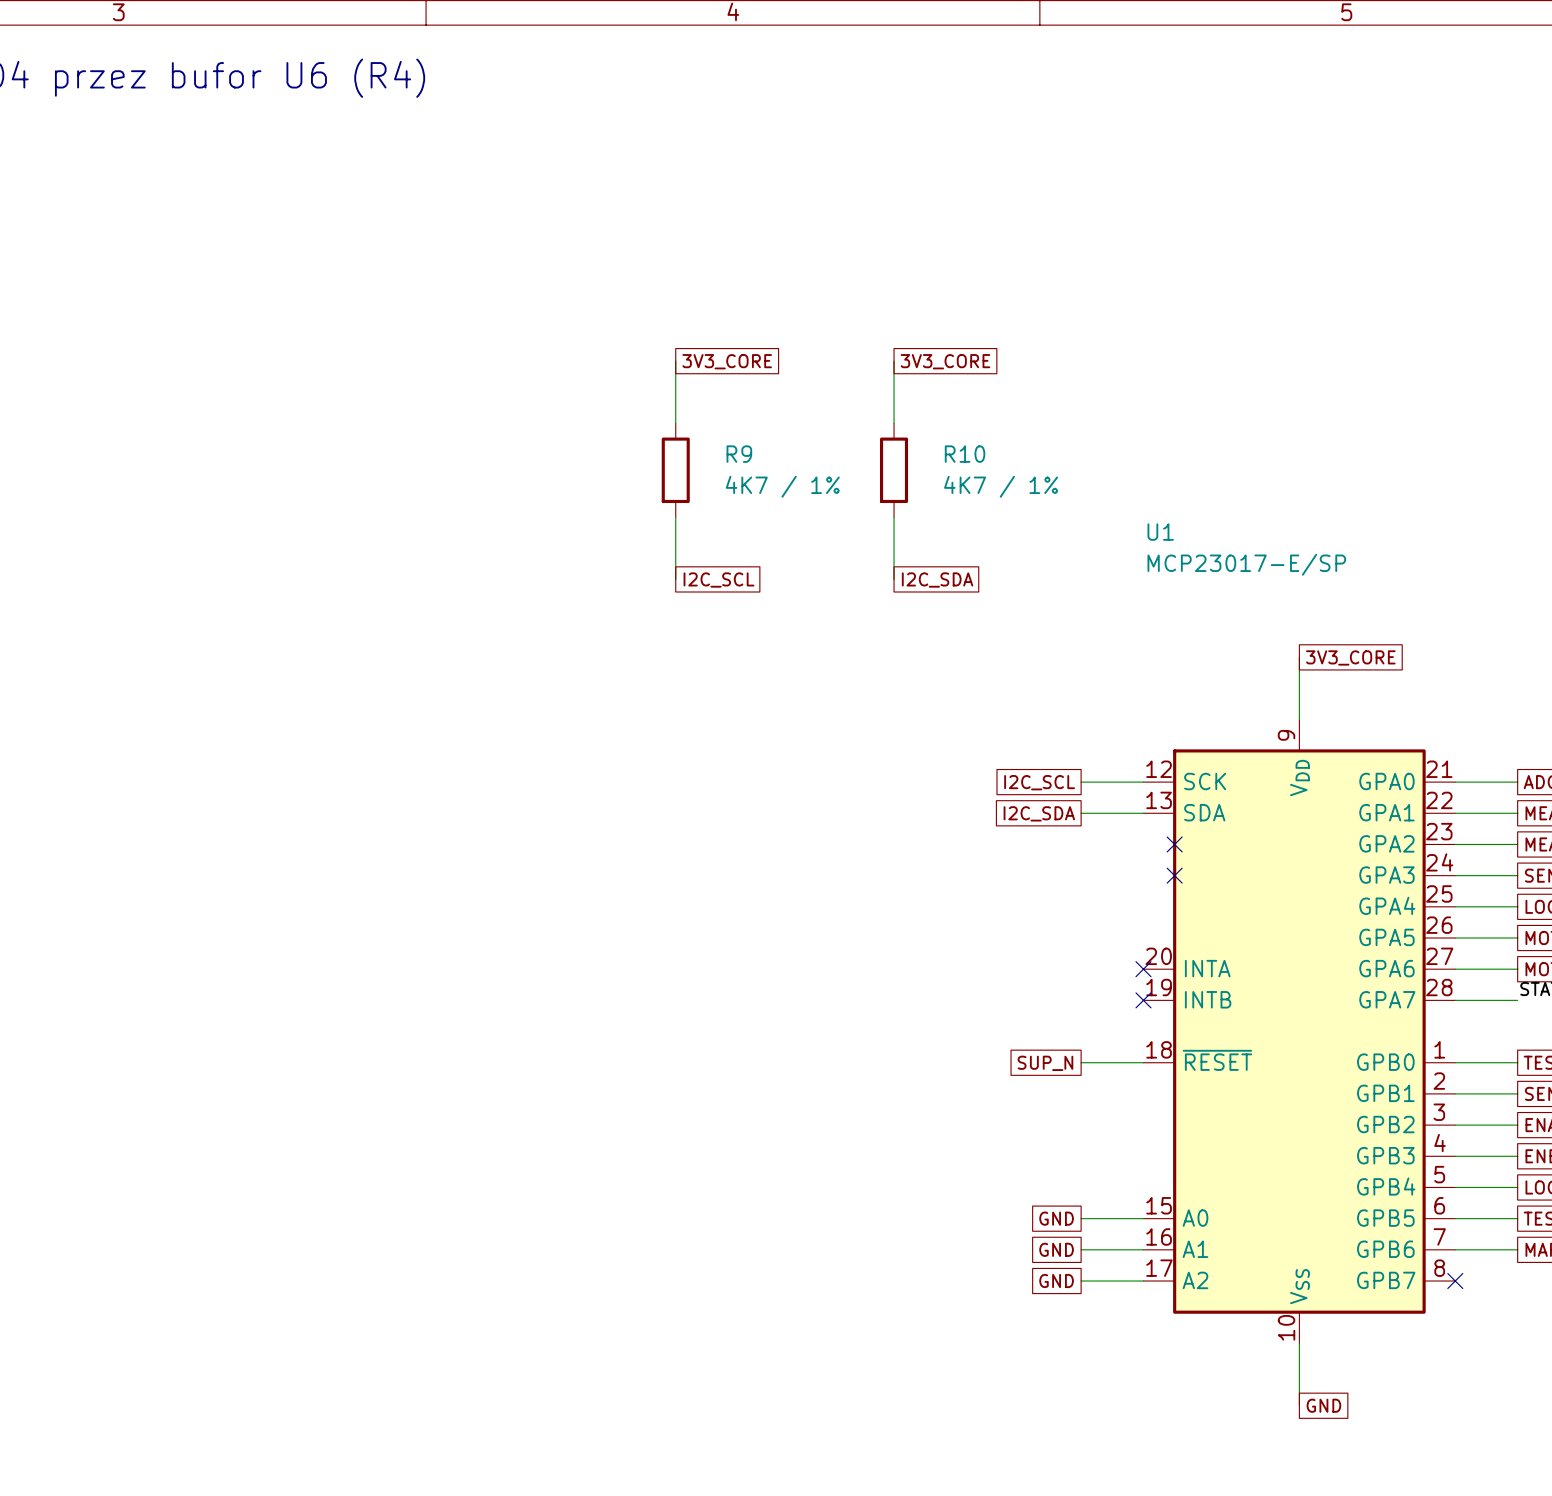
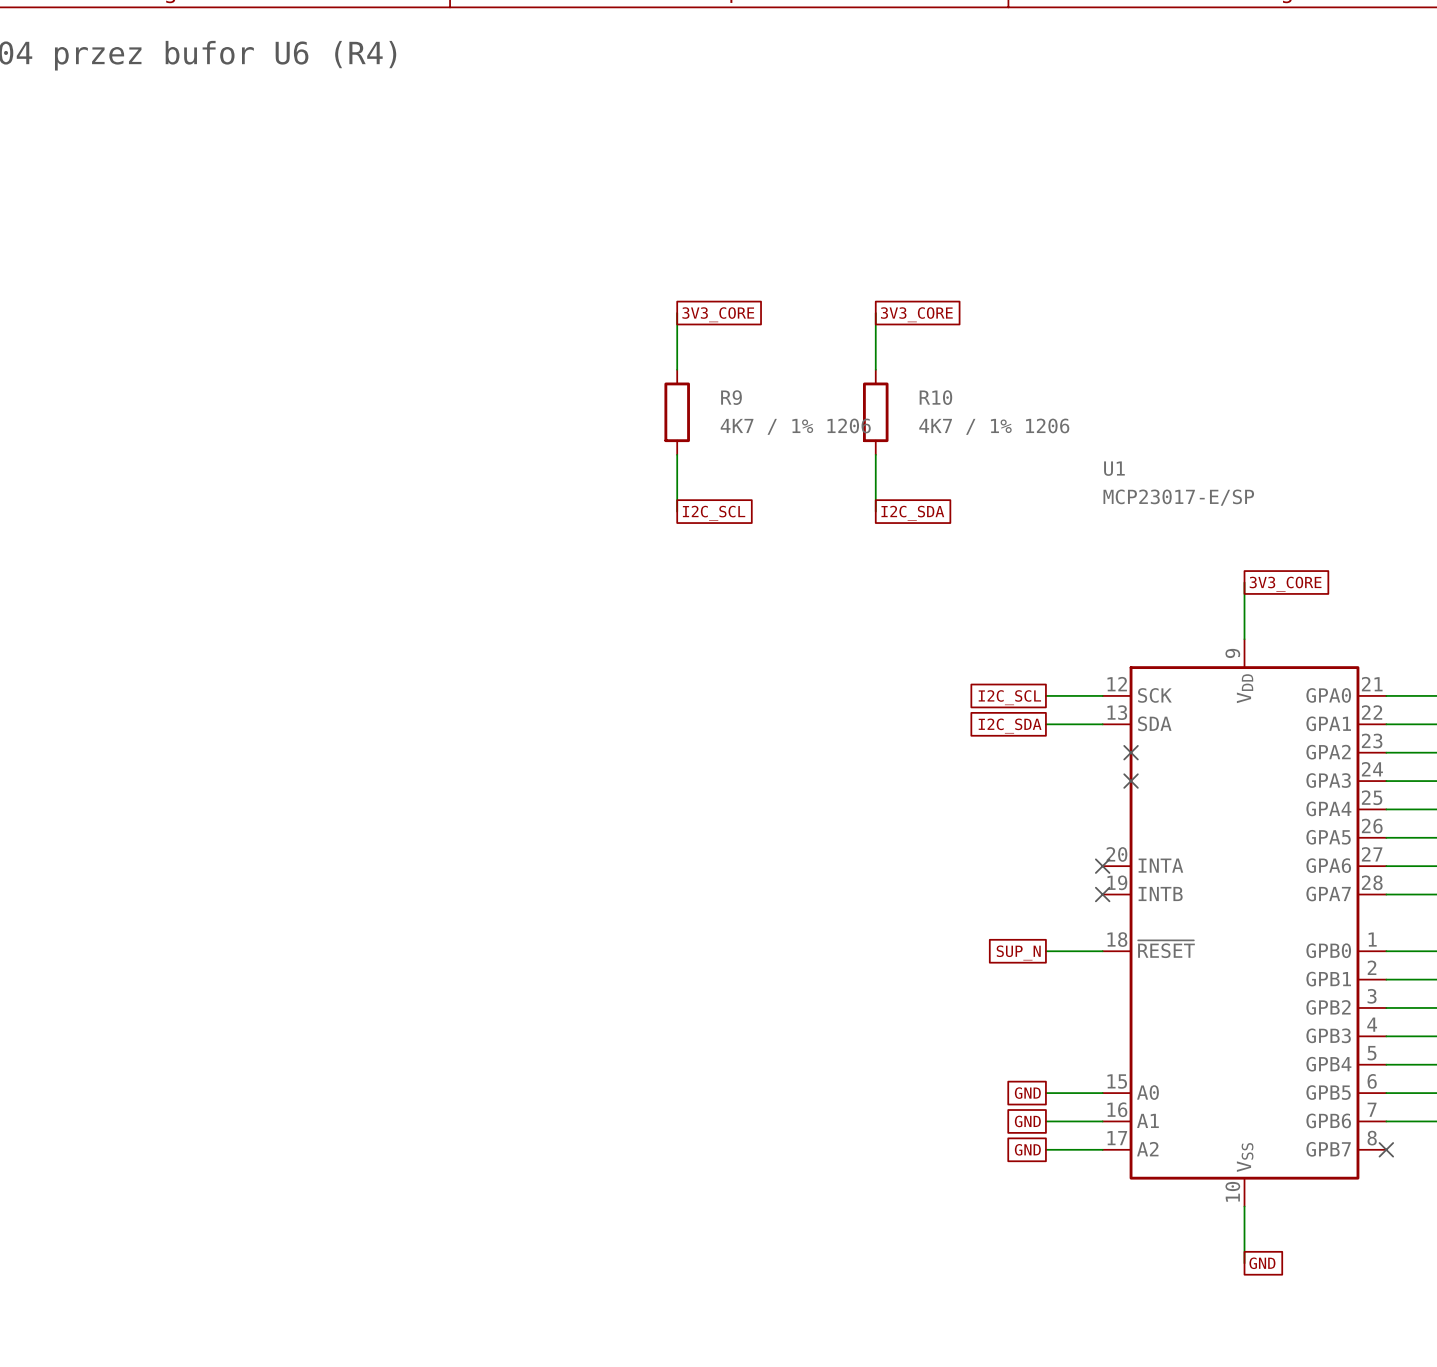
R9 value: 4K7 / 1% (782, 486) -> 4K7 / 1% 1206 (795, 426)
R10 value: 4K7 / 1% (1001, 486) -> 4K7 / 1% 1206 (994, 426)

